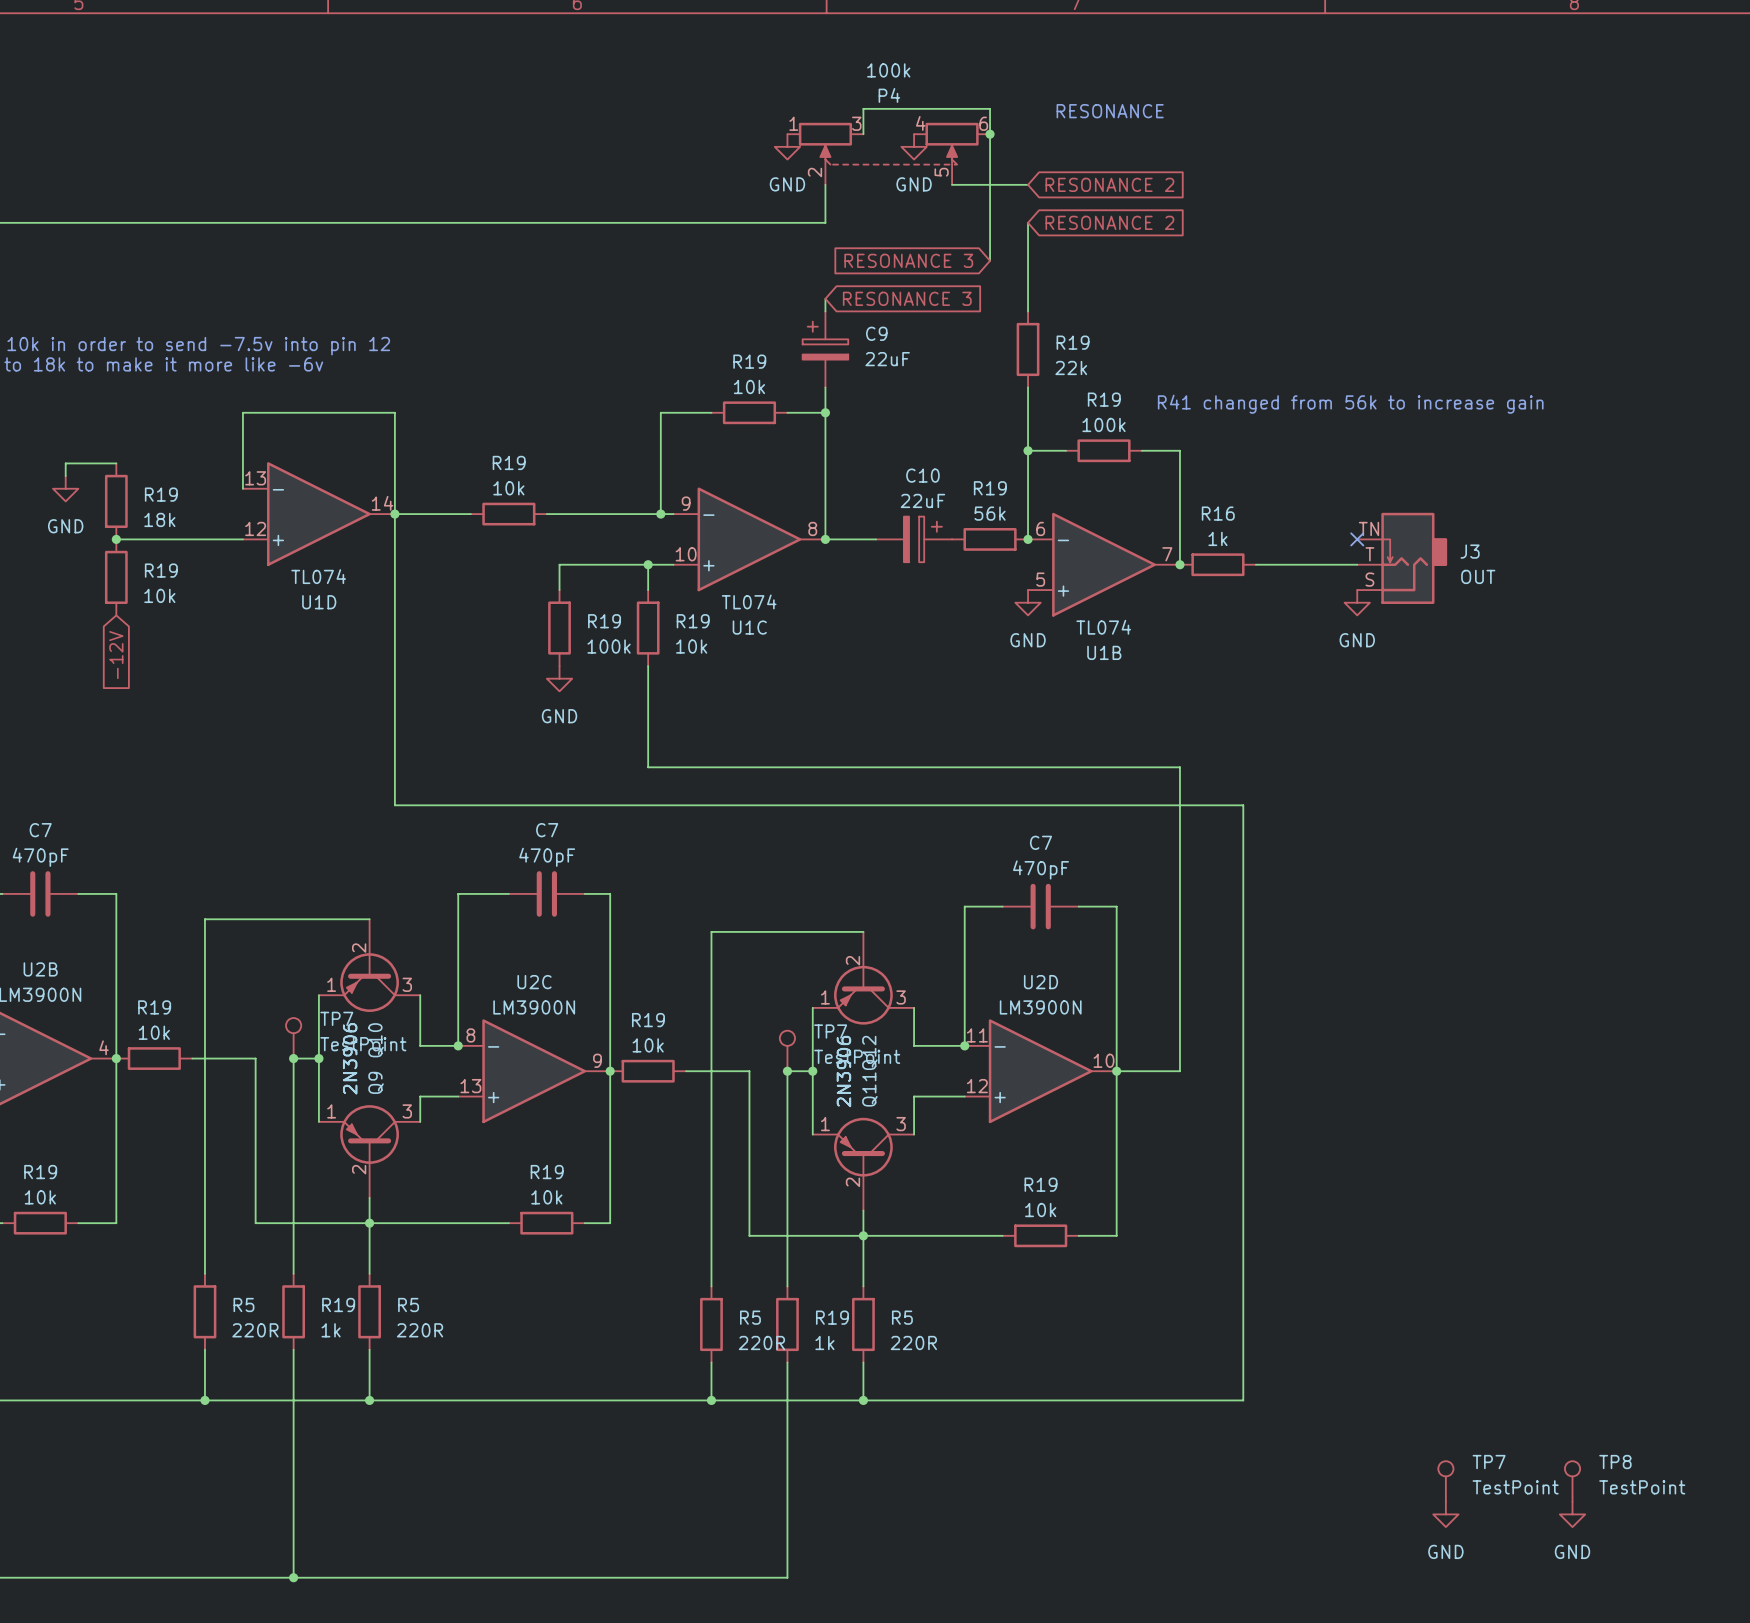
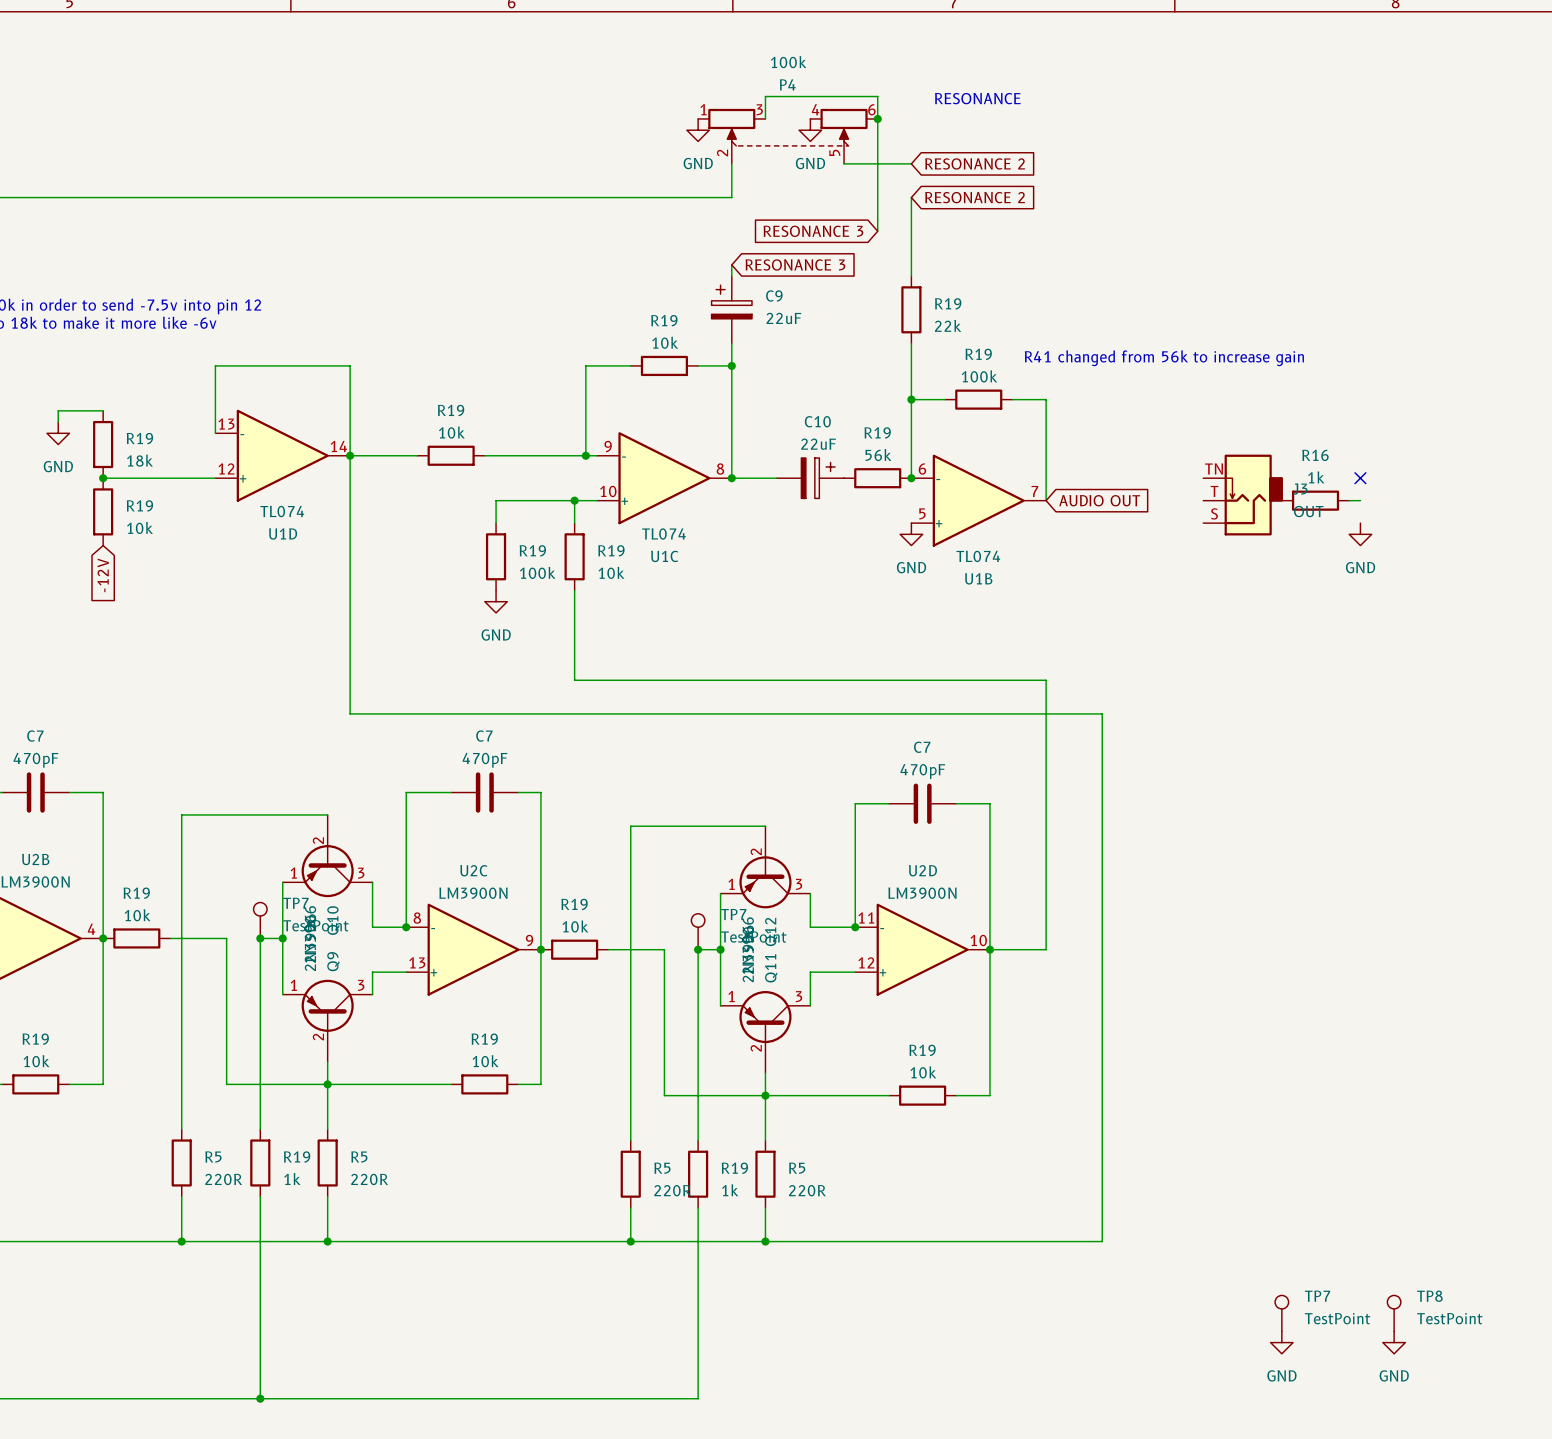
no-connect mark: (1357, 539) -> none
no-connect mark: none -> (1360, 478)
junction: (1179, 564) -> none
R16 position: (1217, 564) -> (1315, 500)
global label: none -> AUDIO OUT (1099, 500)
wire: (1255, 564) (1357, 564) -> none
wire: none -> (1349, 500) (1360, 500)
power symbol position: GND (1357, 602) -> GND (1360, 534)

